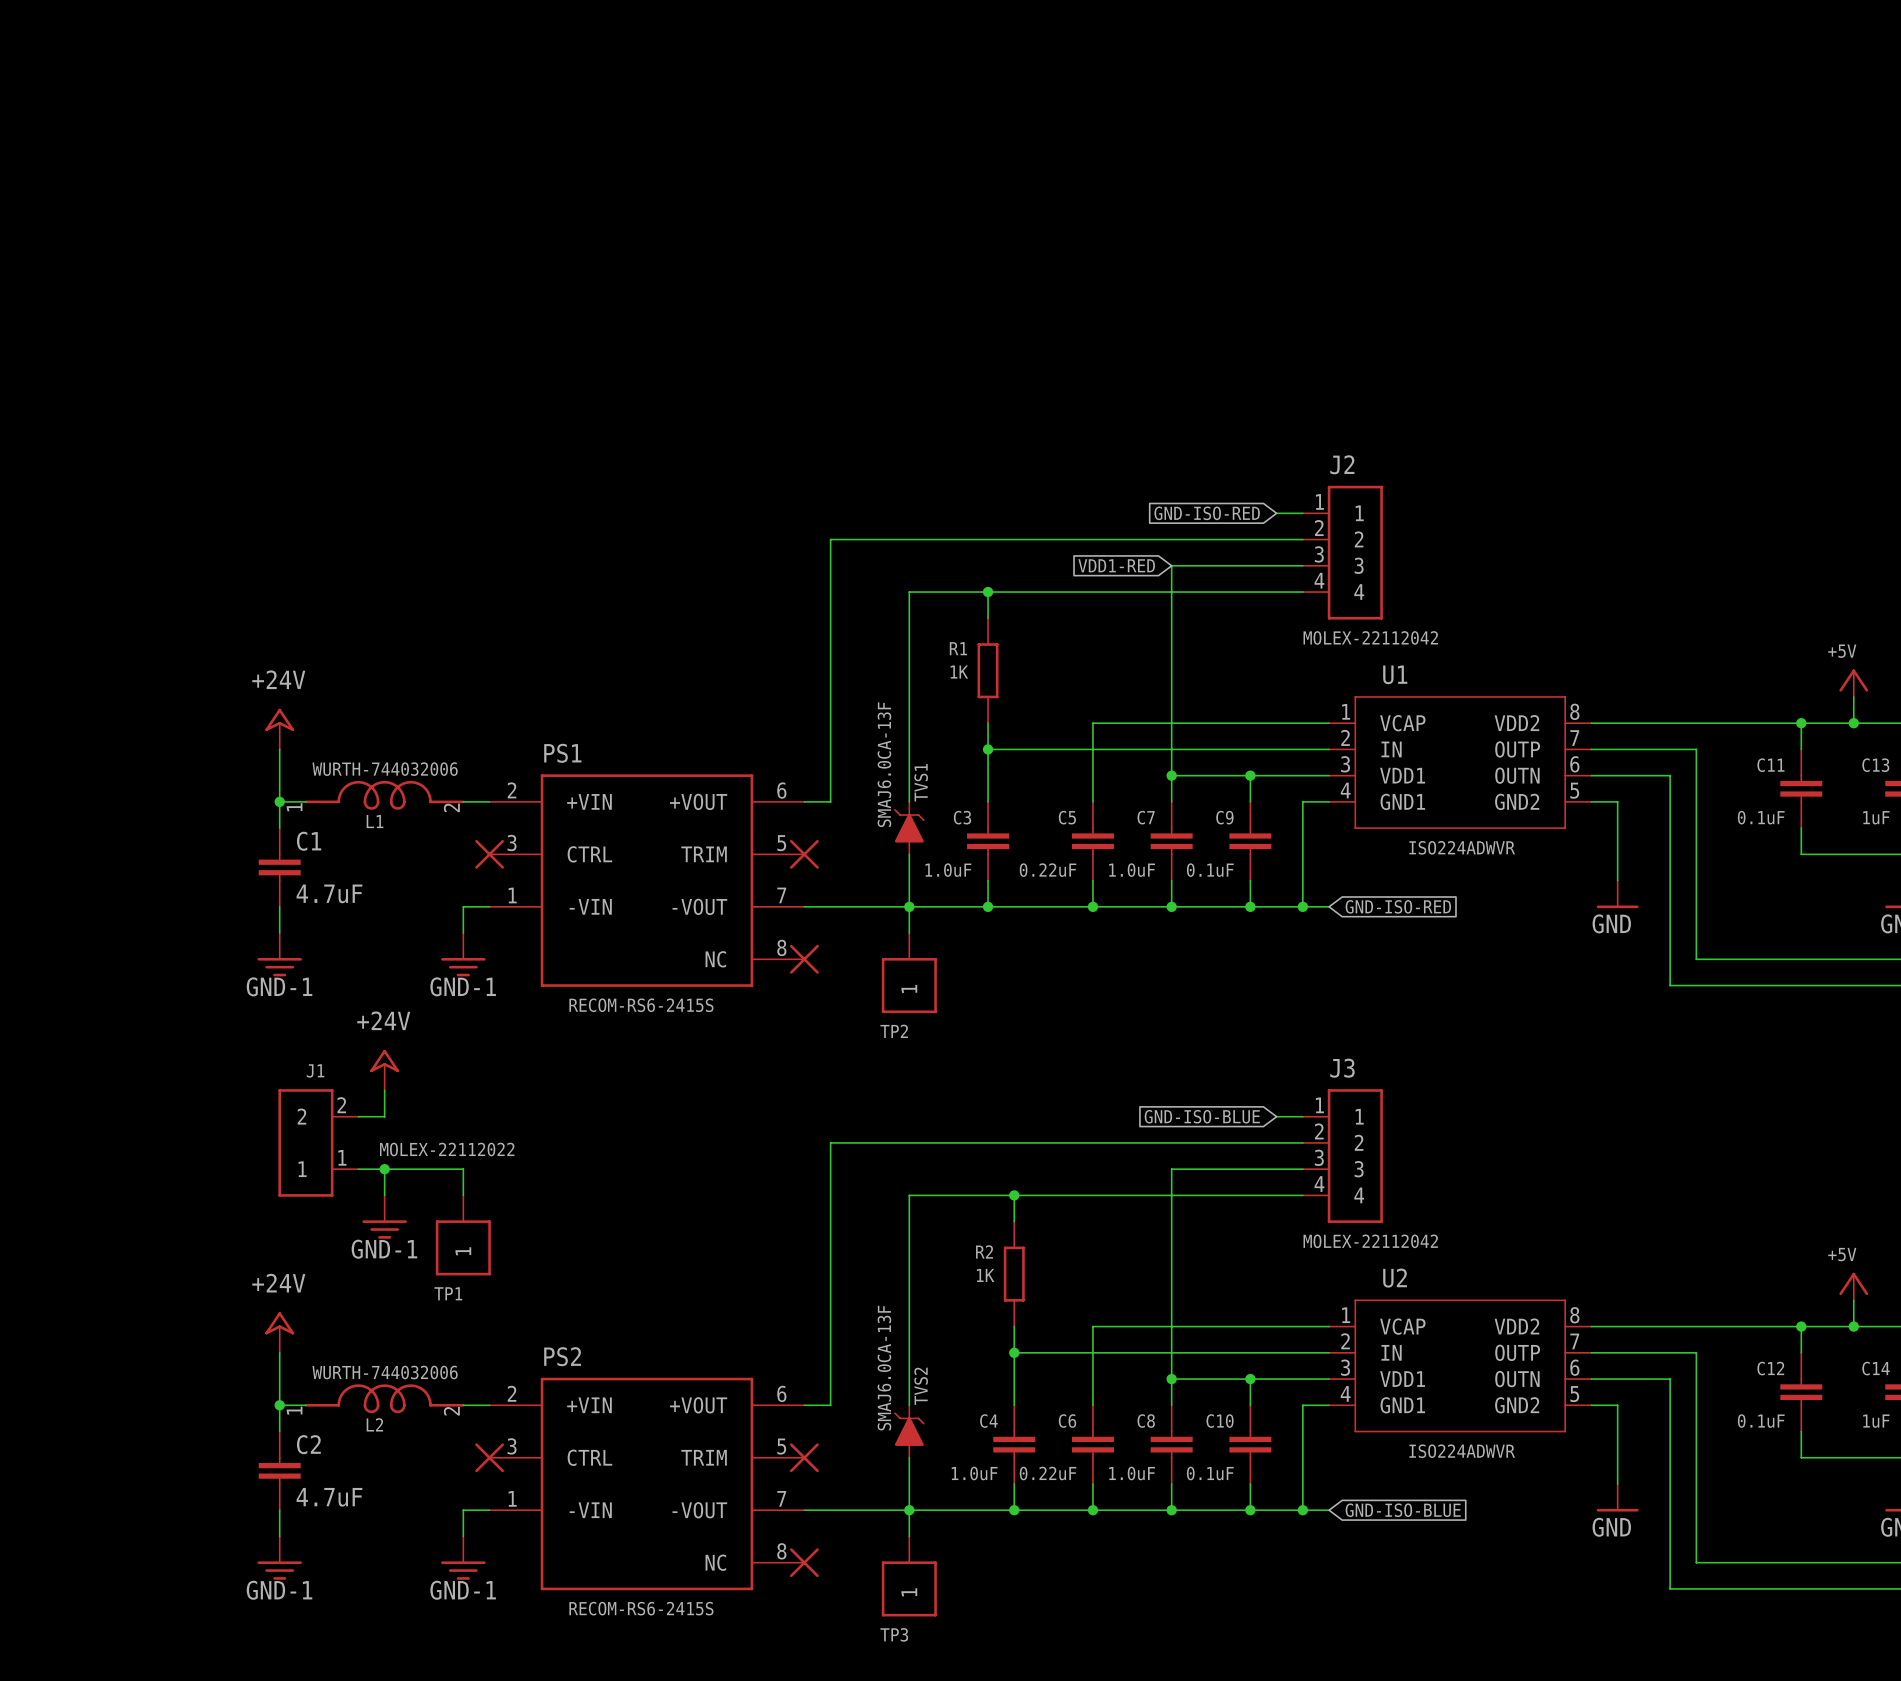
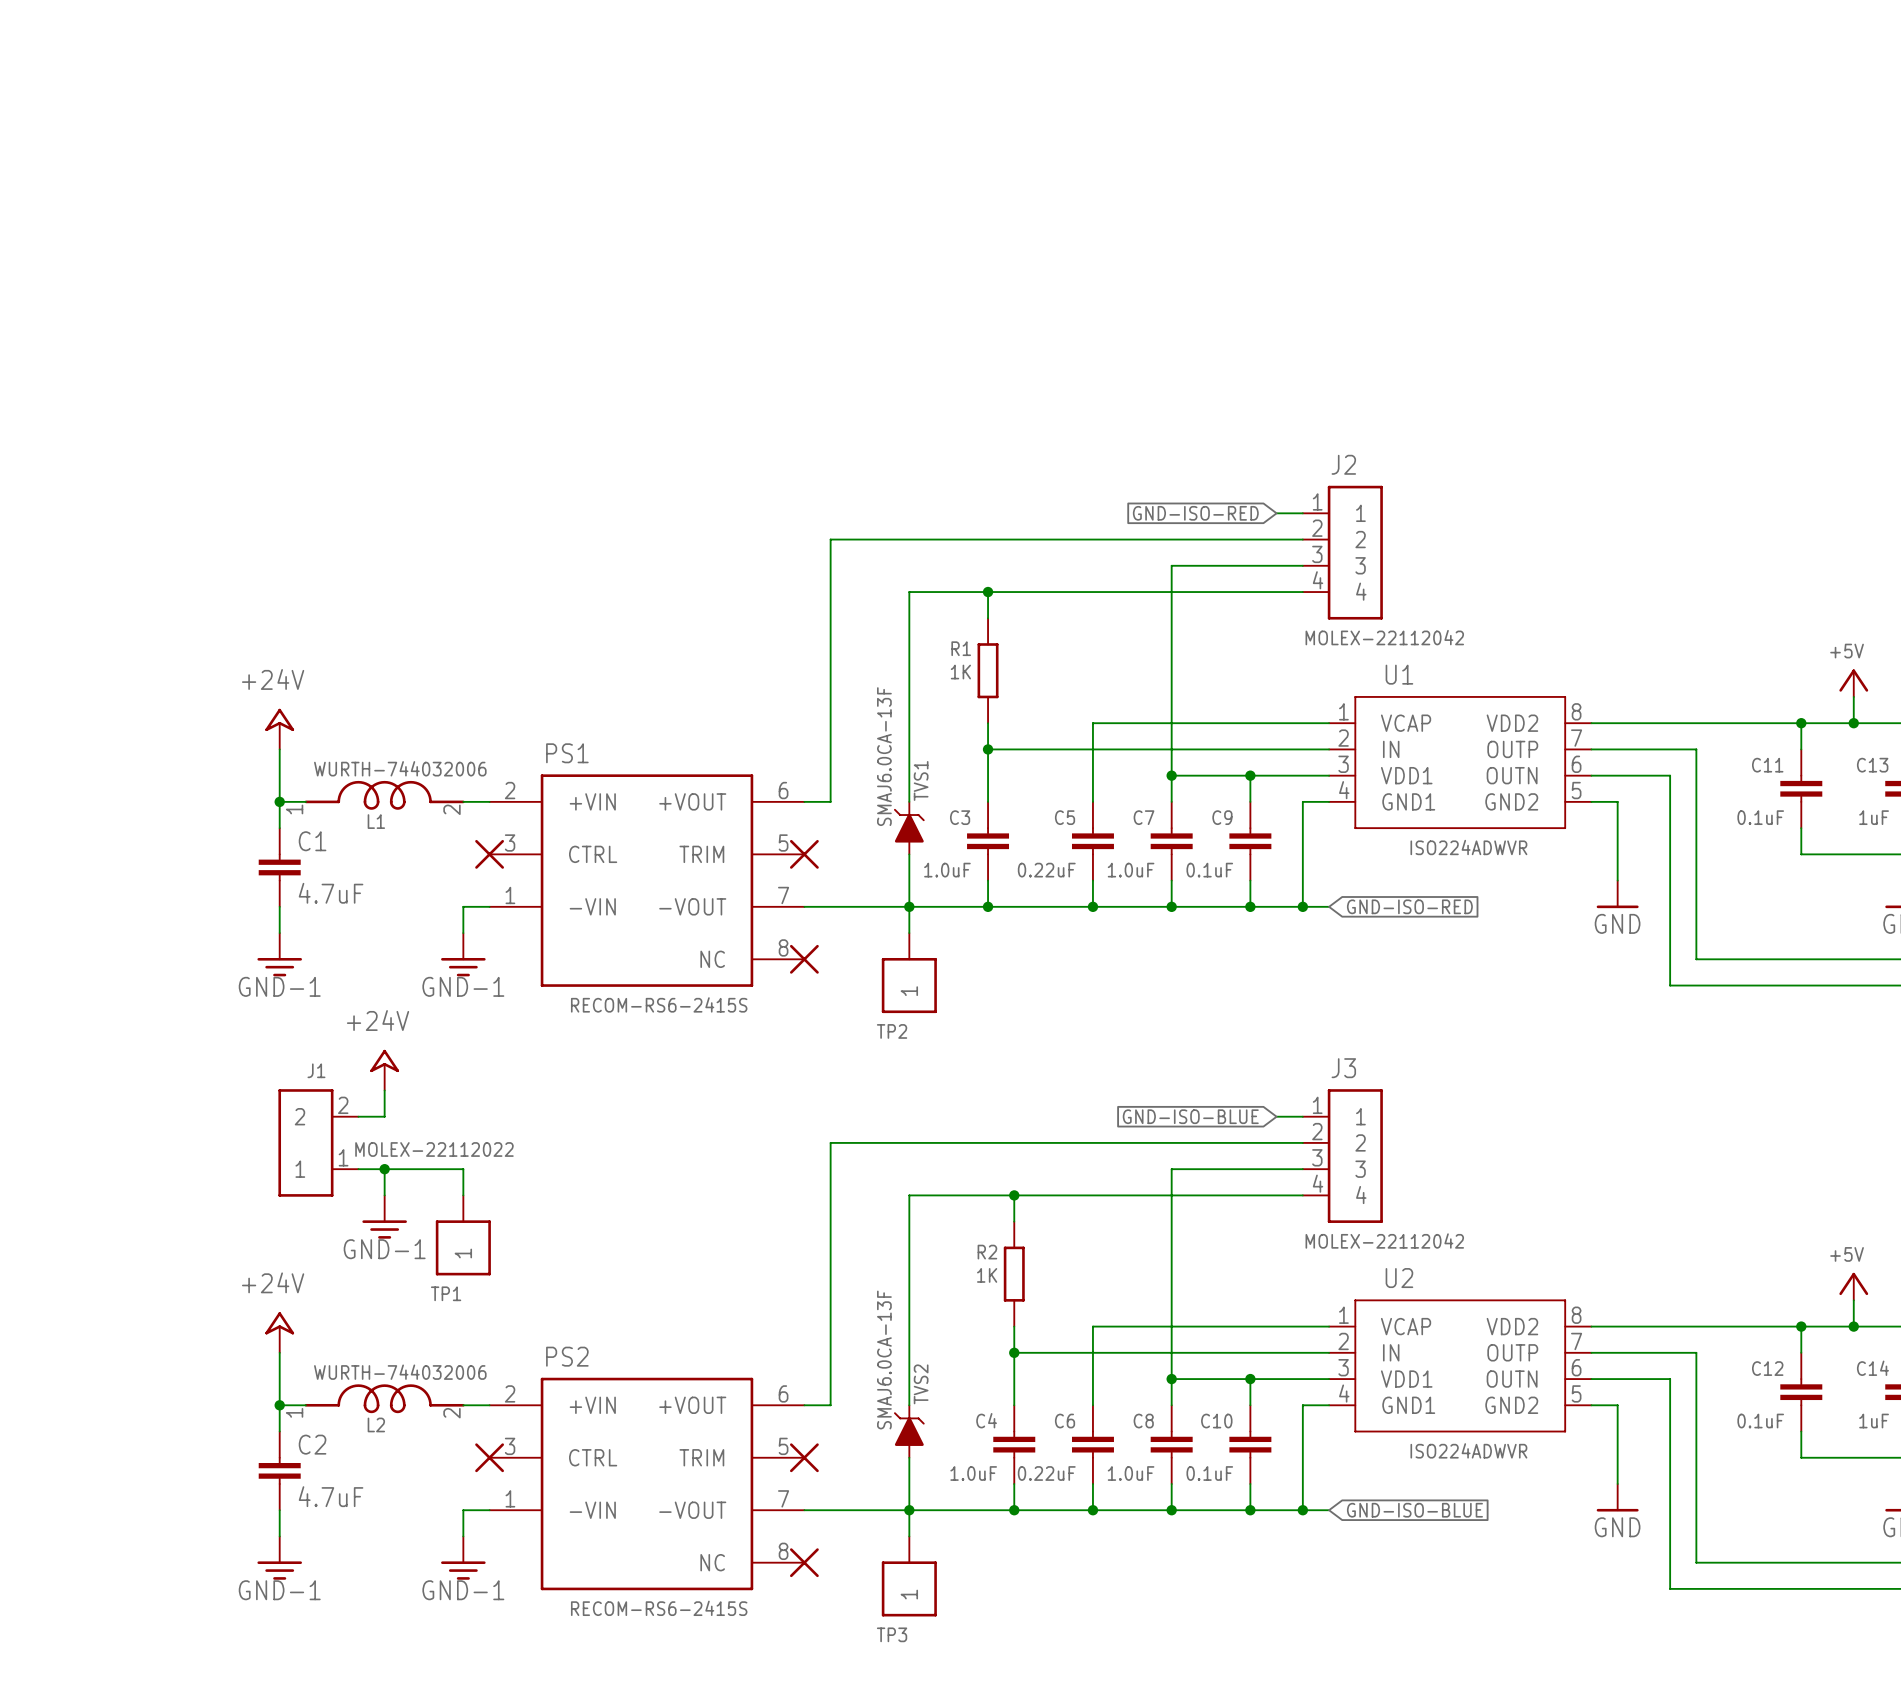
global label: VDD1-RED (1116, 565) -> none

